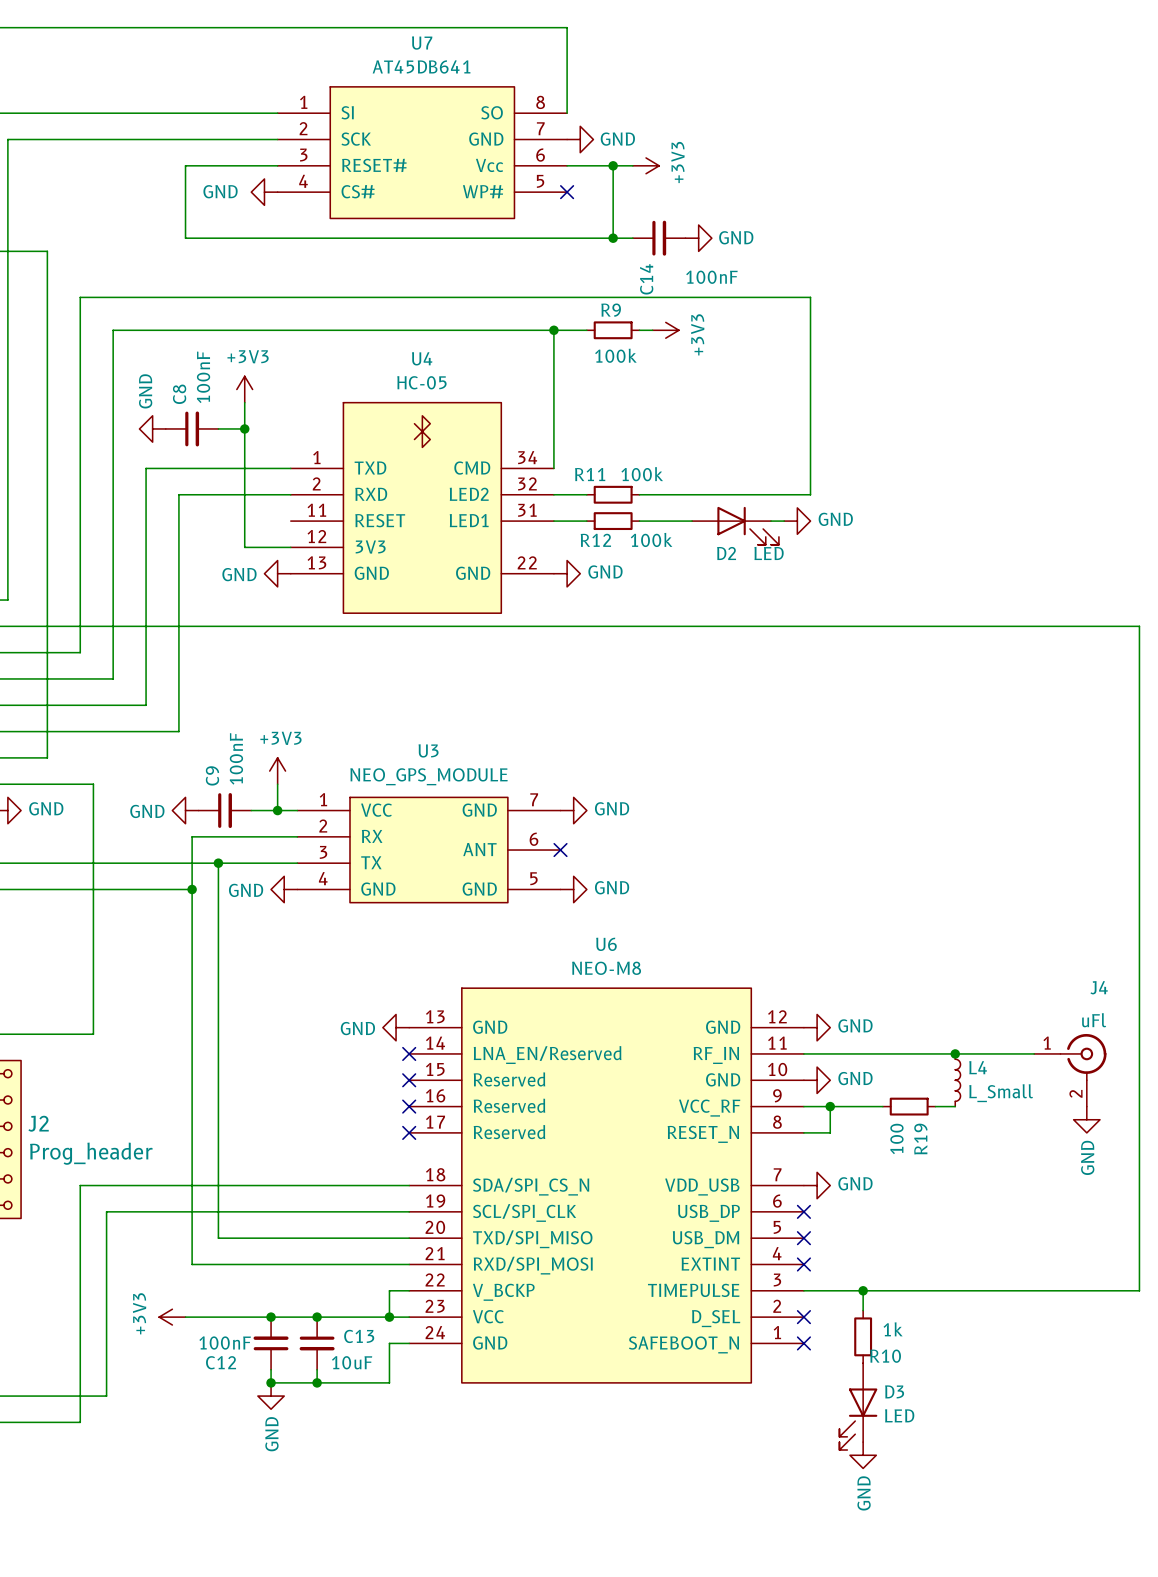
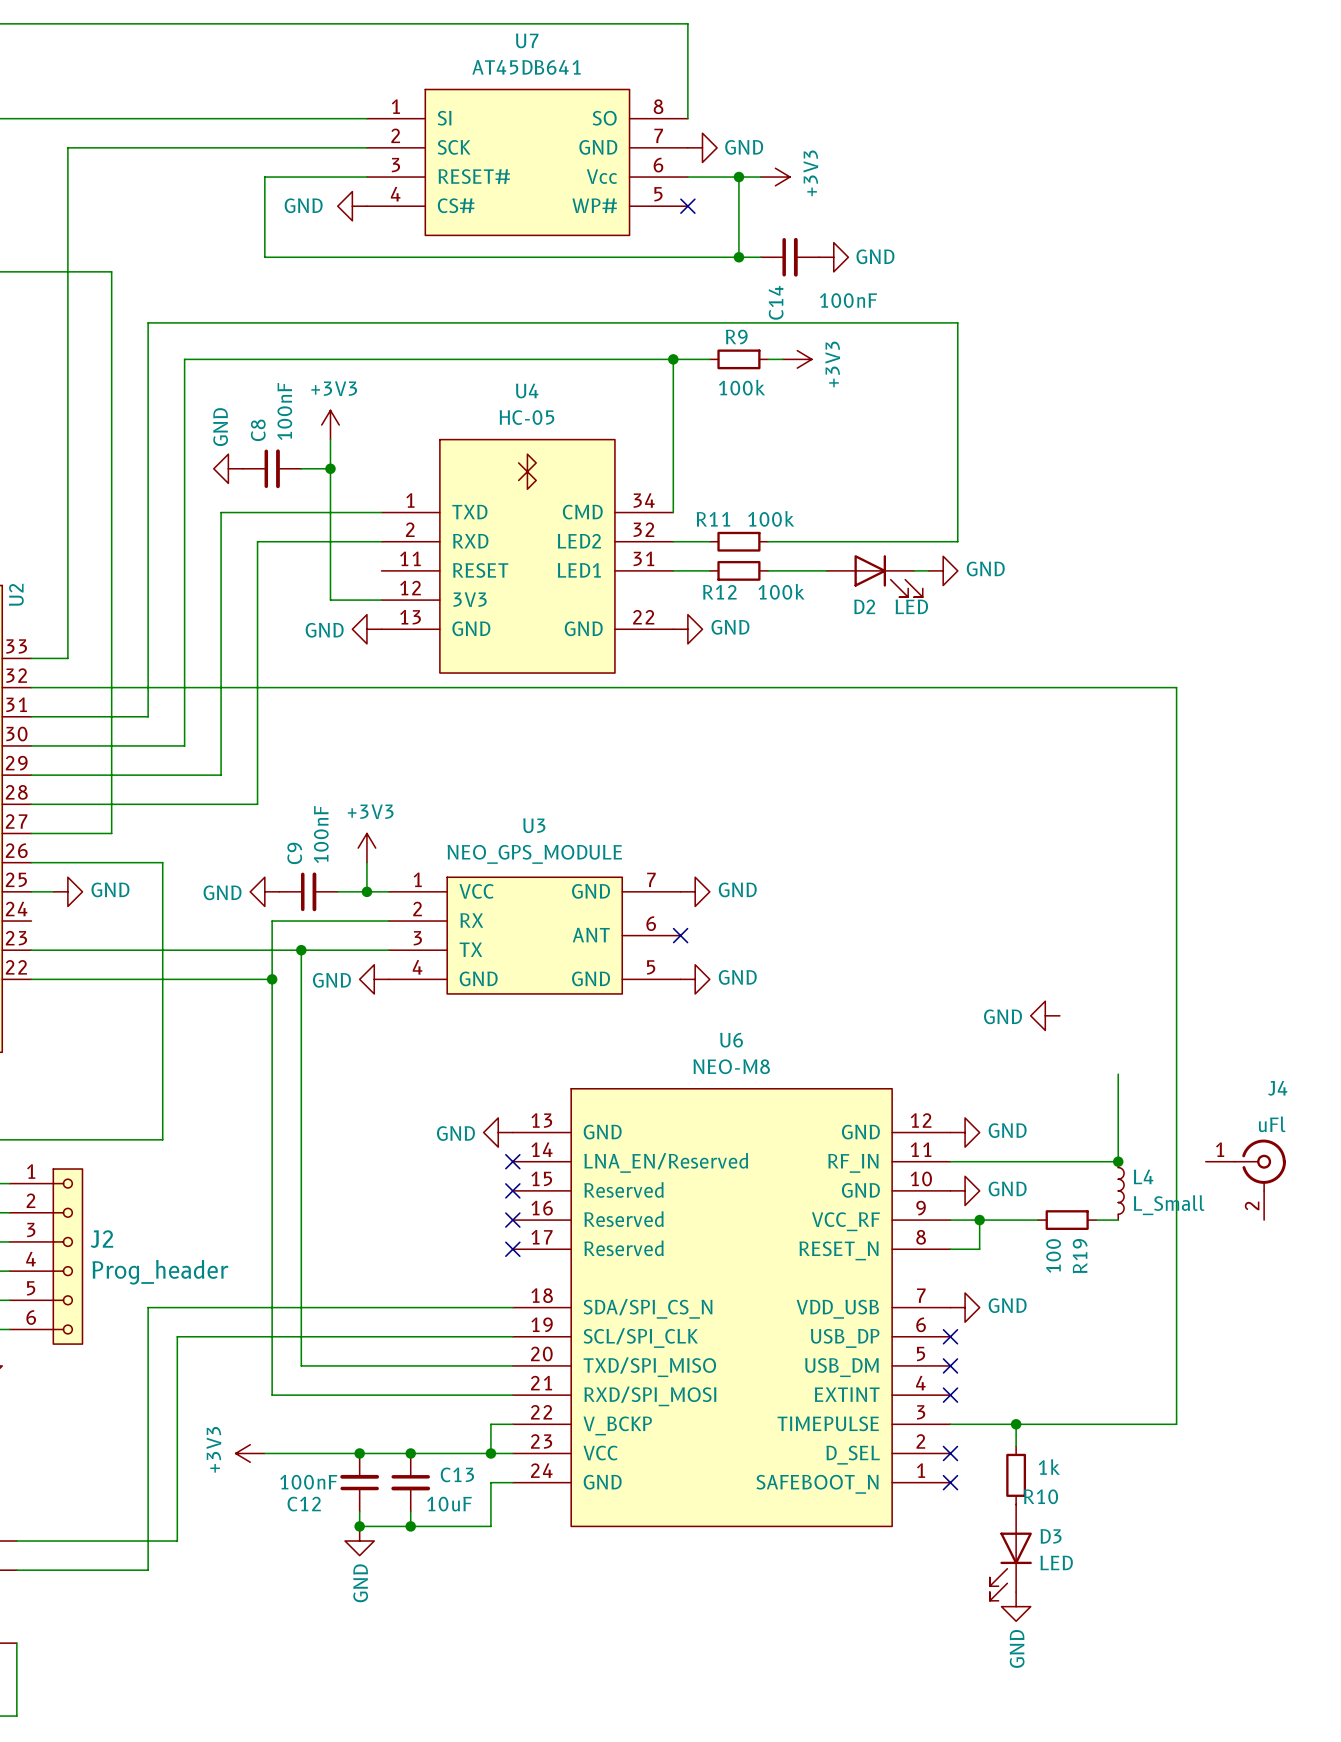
wire: (1007, 626) (1139, 626) (1139, 1290) (1007, 1290) -> (1176, 687) (1176, 1424)
power symbol: none -> GND (1045, 1015)
wire: (955, 1053) (1034, 1053) -> (1118, 1161) (1118, 1074)
power symbol: GND (1086, 1119) -> none

